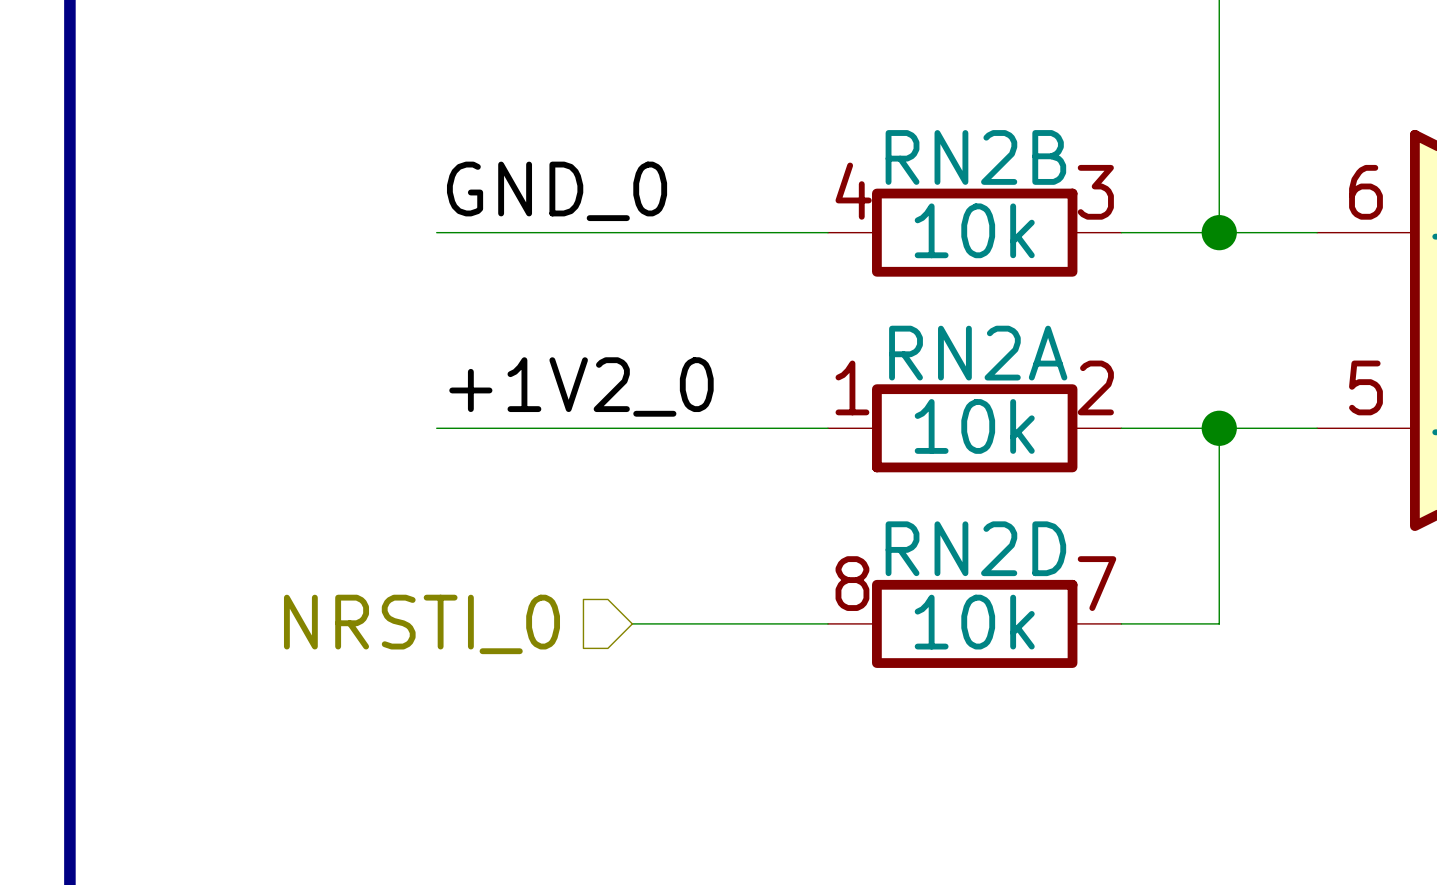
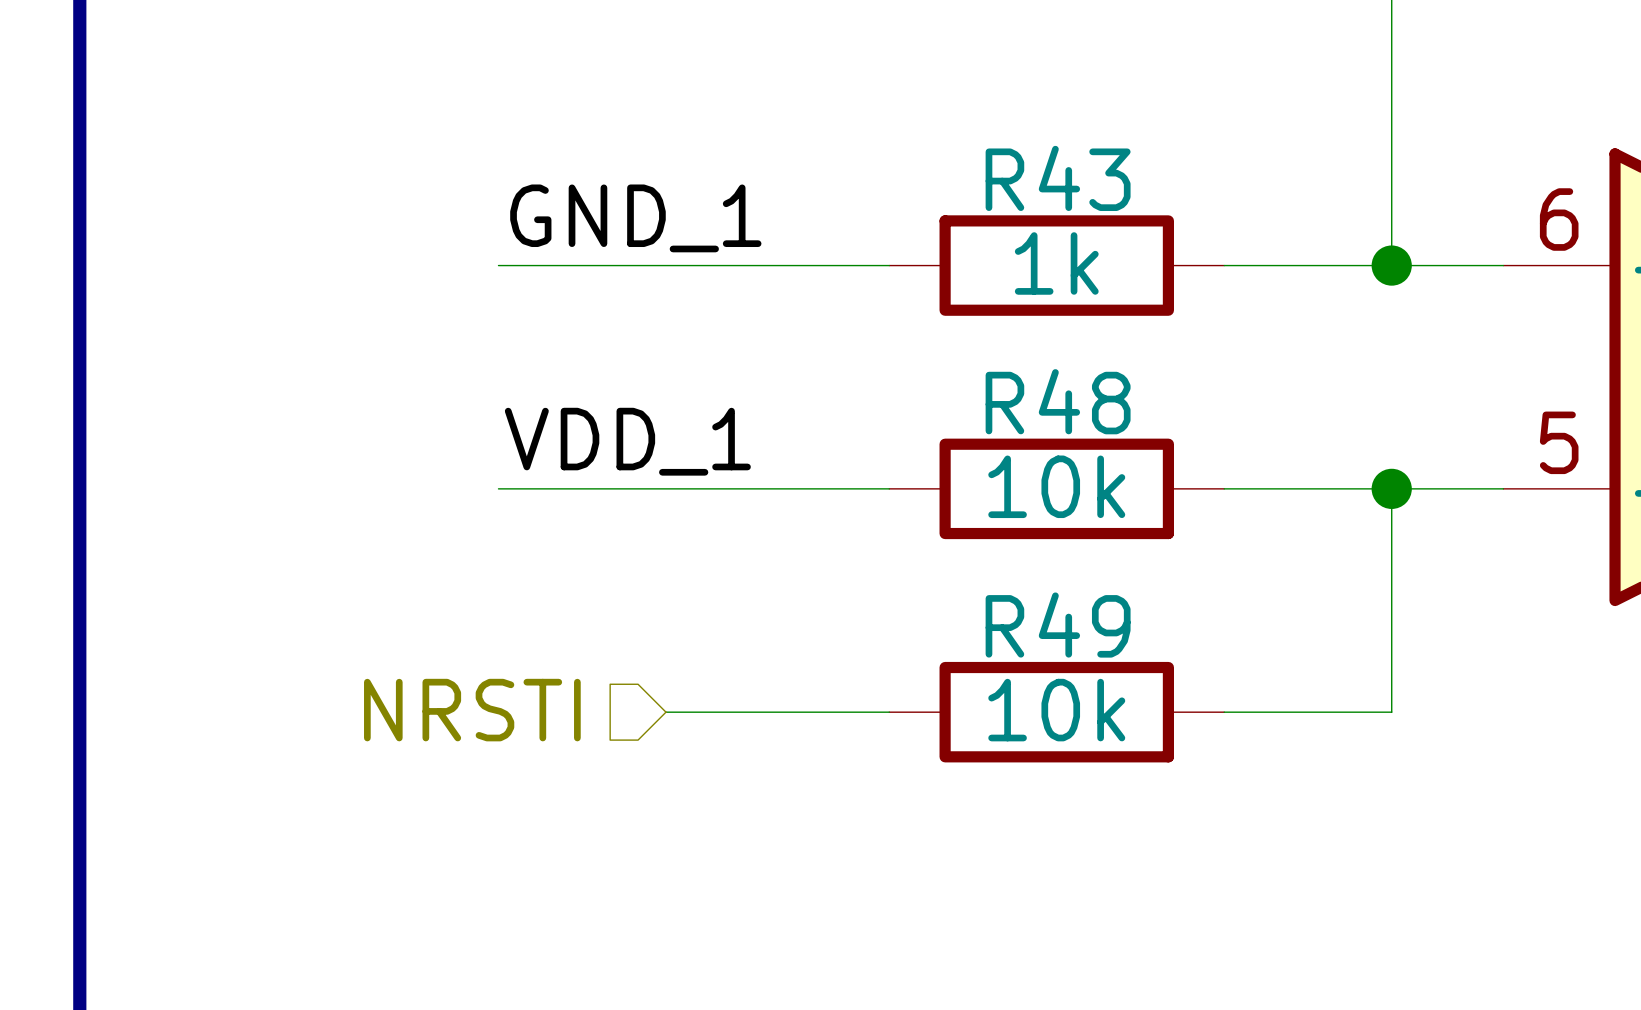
label: GND_0 (557, 191) -> GND_1 (635, 218)
R43: none -> 1k (1056, 265)
RN2B: 10k (974, 232) -> none
label: +1V2_0 (581, 386) -> VDD_1 (627, 441)
R48: none -> 10k (1056, 488)
RN2A: 10k (974, 428) -> none
wire: none -> (665, 712) (721, 712)
R49: none -> 10k (1056, 712)
RN2D: 10k (974, 623) -> none
hierarchical label: NRSTI_0 (421, 624) -> NRSTI (472, 710)

